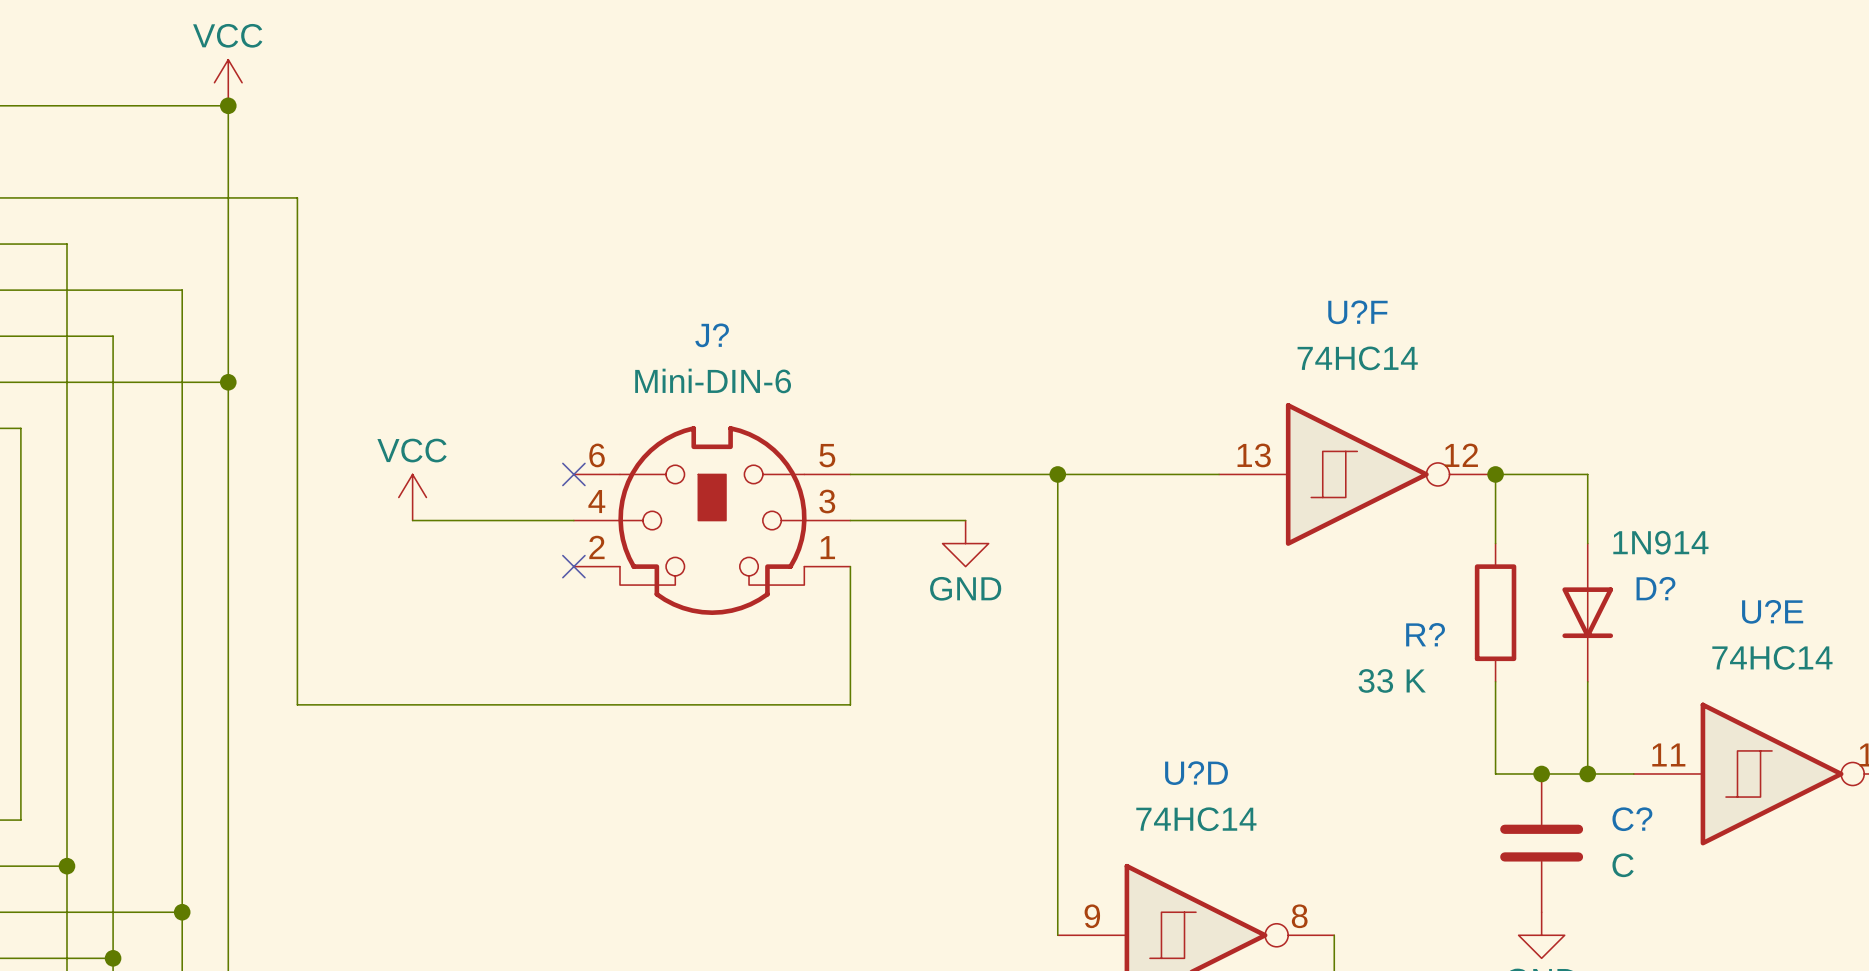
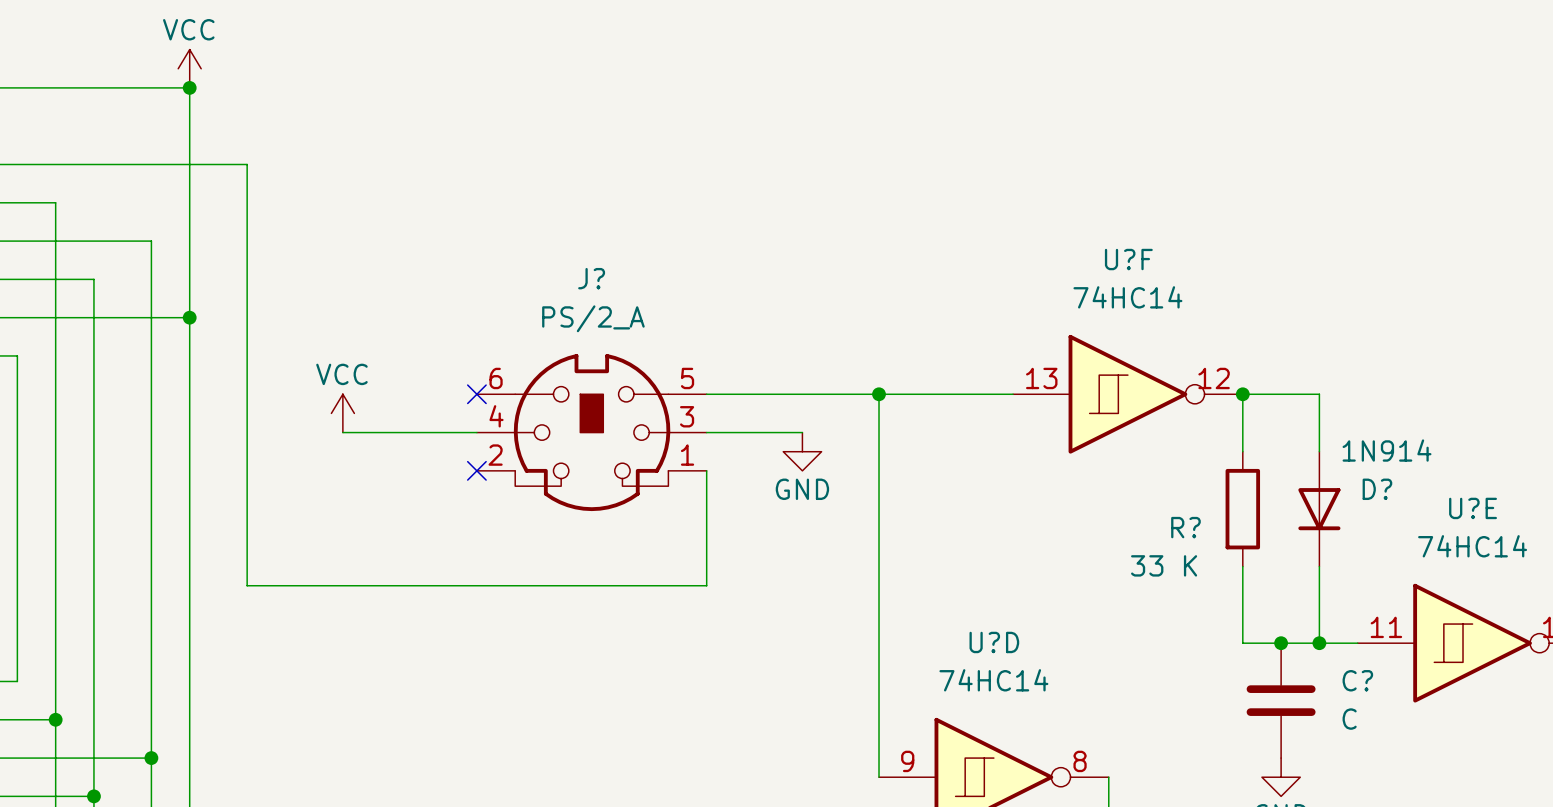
J? value: Mini-DIN-6 (713, 380) -> PS/2_A (593, 318)

